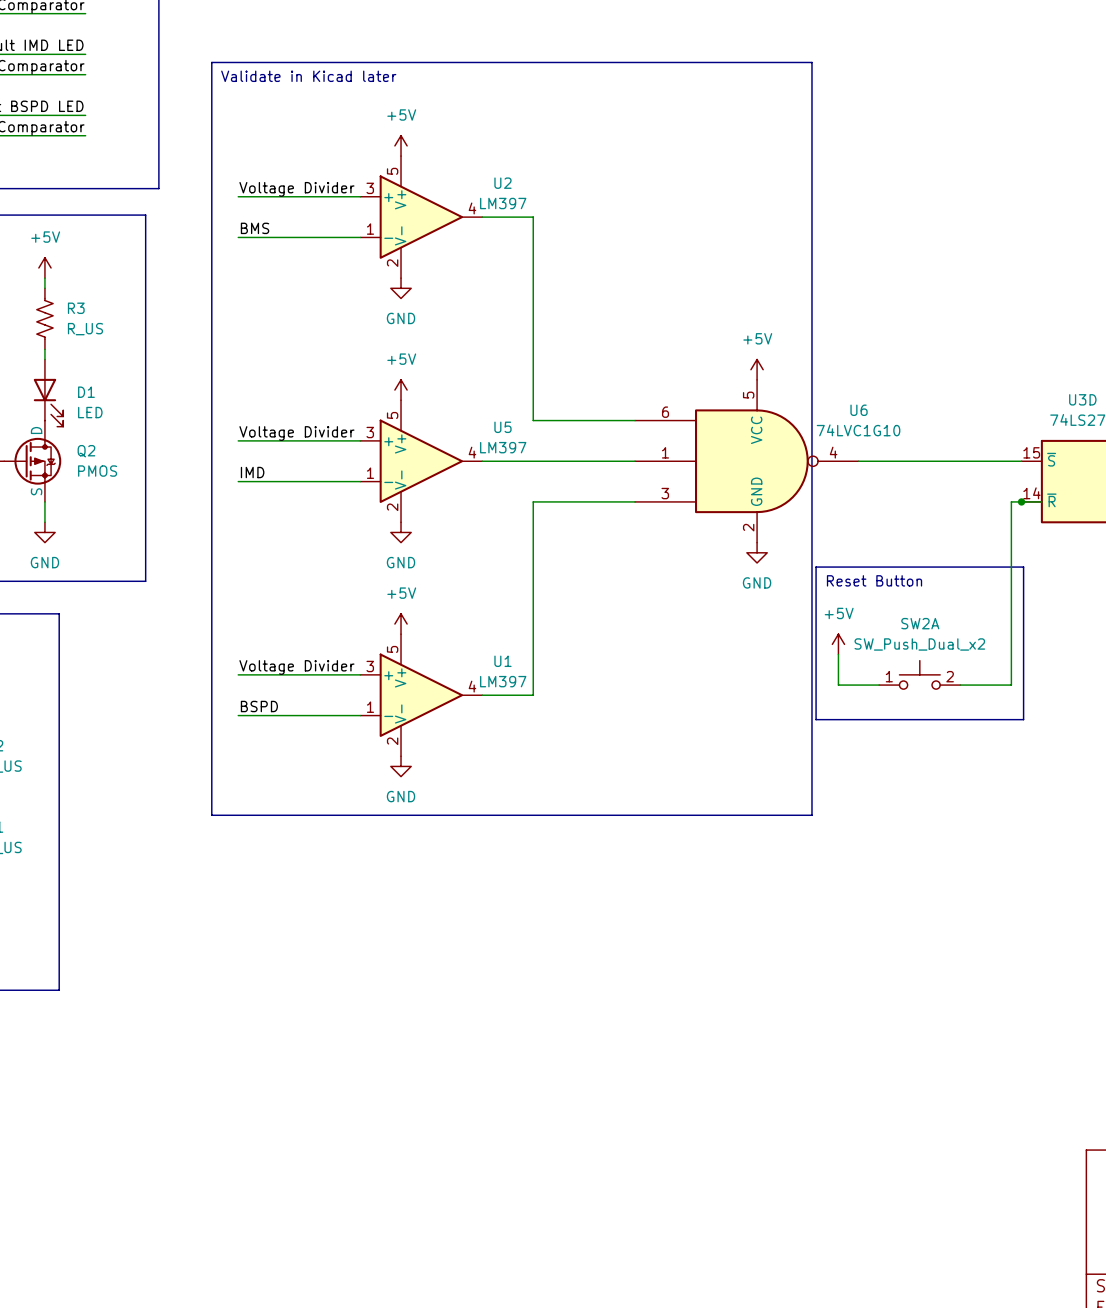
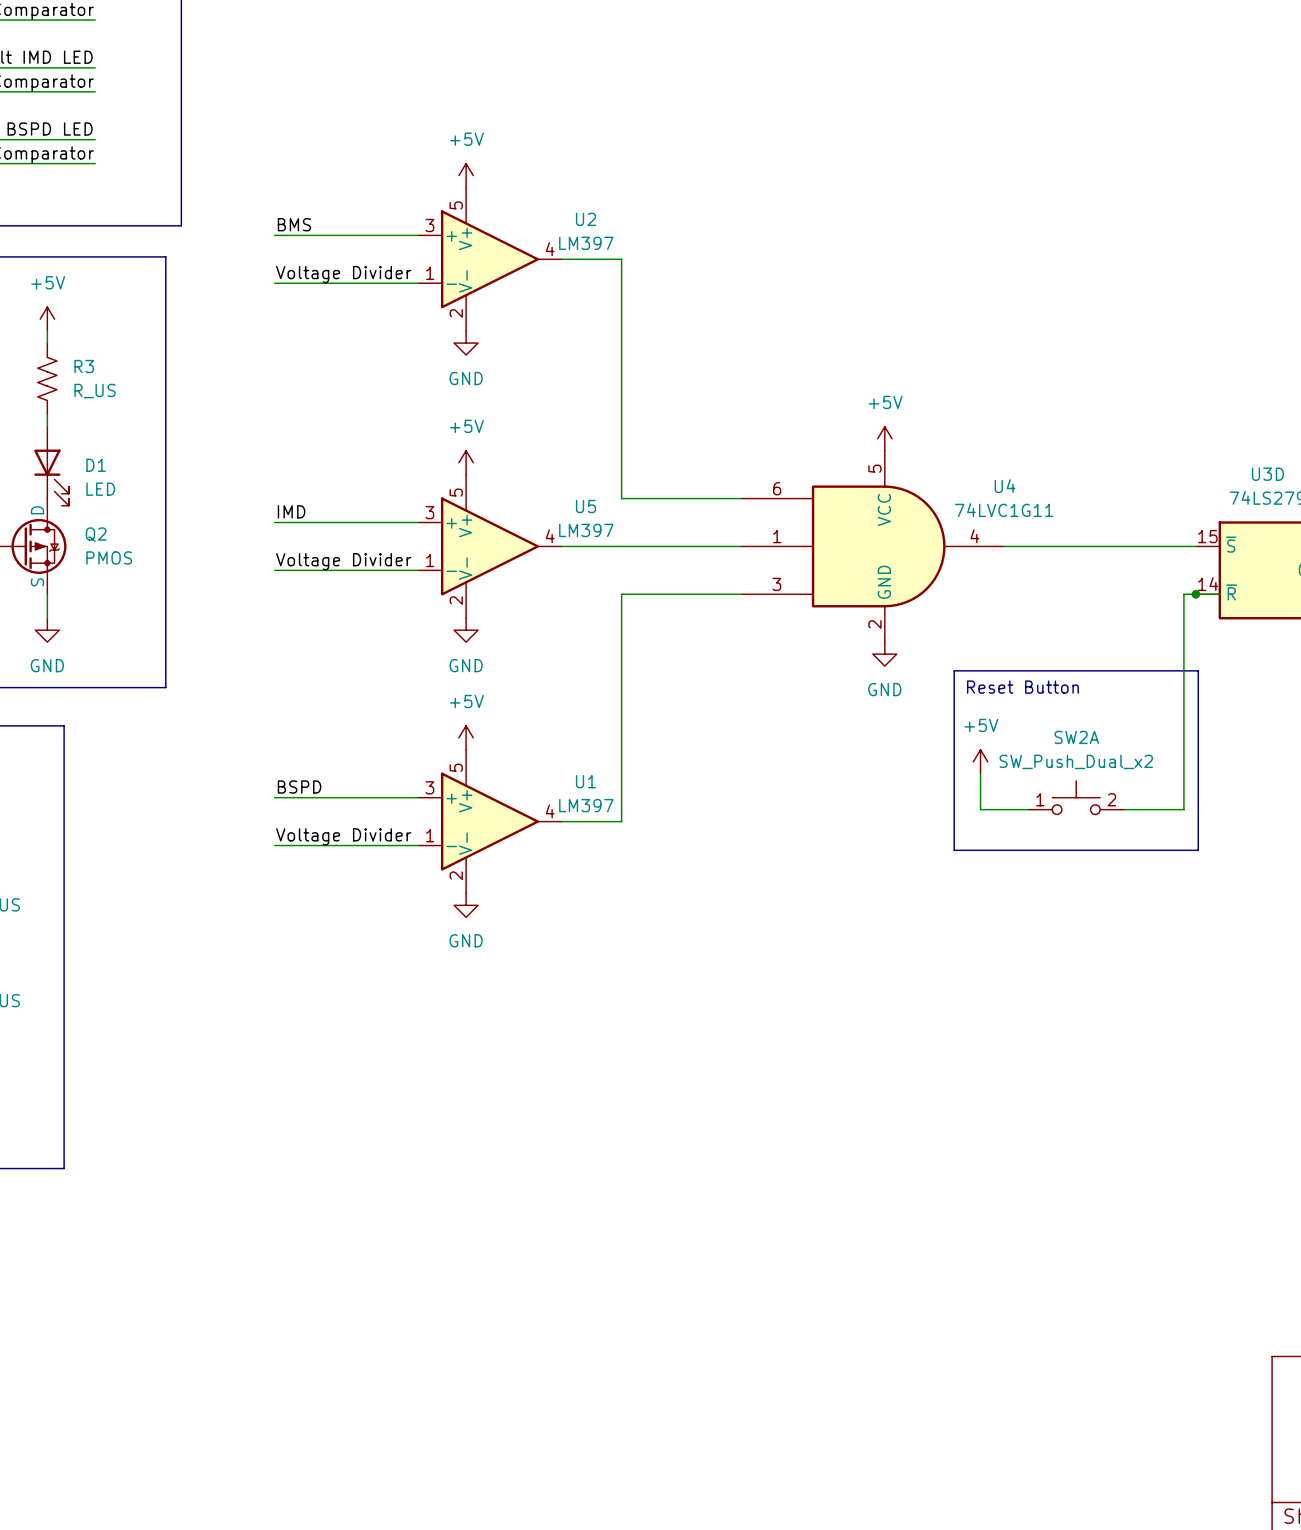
line: (211, 62) (811, 62) (811, 815) (211, 815) (211, 62) -> none
text: Validate in Kicad later (308, 76) -> none
label: Voltage Divider (296, 189) -> BMS (294, 224)
label: BMS (255, 228) -> Voltage Divider (343, 274)
label: Voltage Divider (296, 433) -> IMD (291, 511)
U6: 74LVC1G10 (746, 461) -> none
U4: none -> 74LVC1G11 (872, 546)
label: IMD (252, 472) -> Voltage Divider (343, 561)
label: Voltage Divider (296, 667) -> BSPD (299, 787)
label: BSPD (259, 706) -> Voltage Divider (343, 836)

